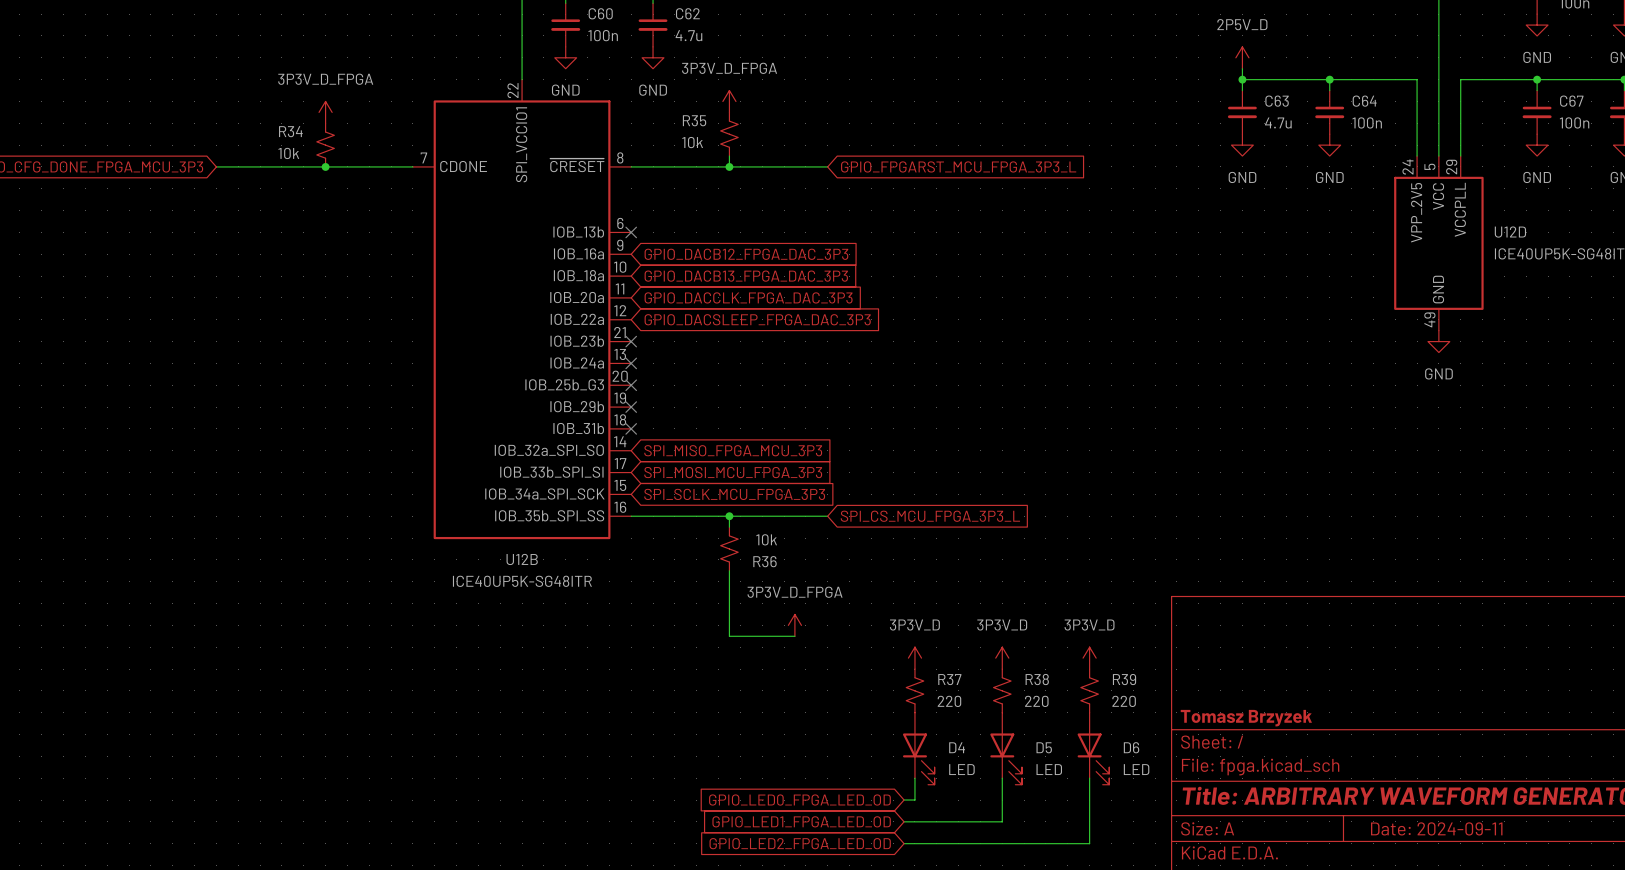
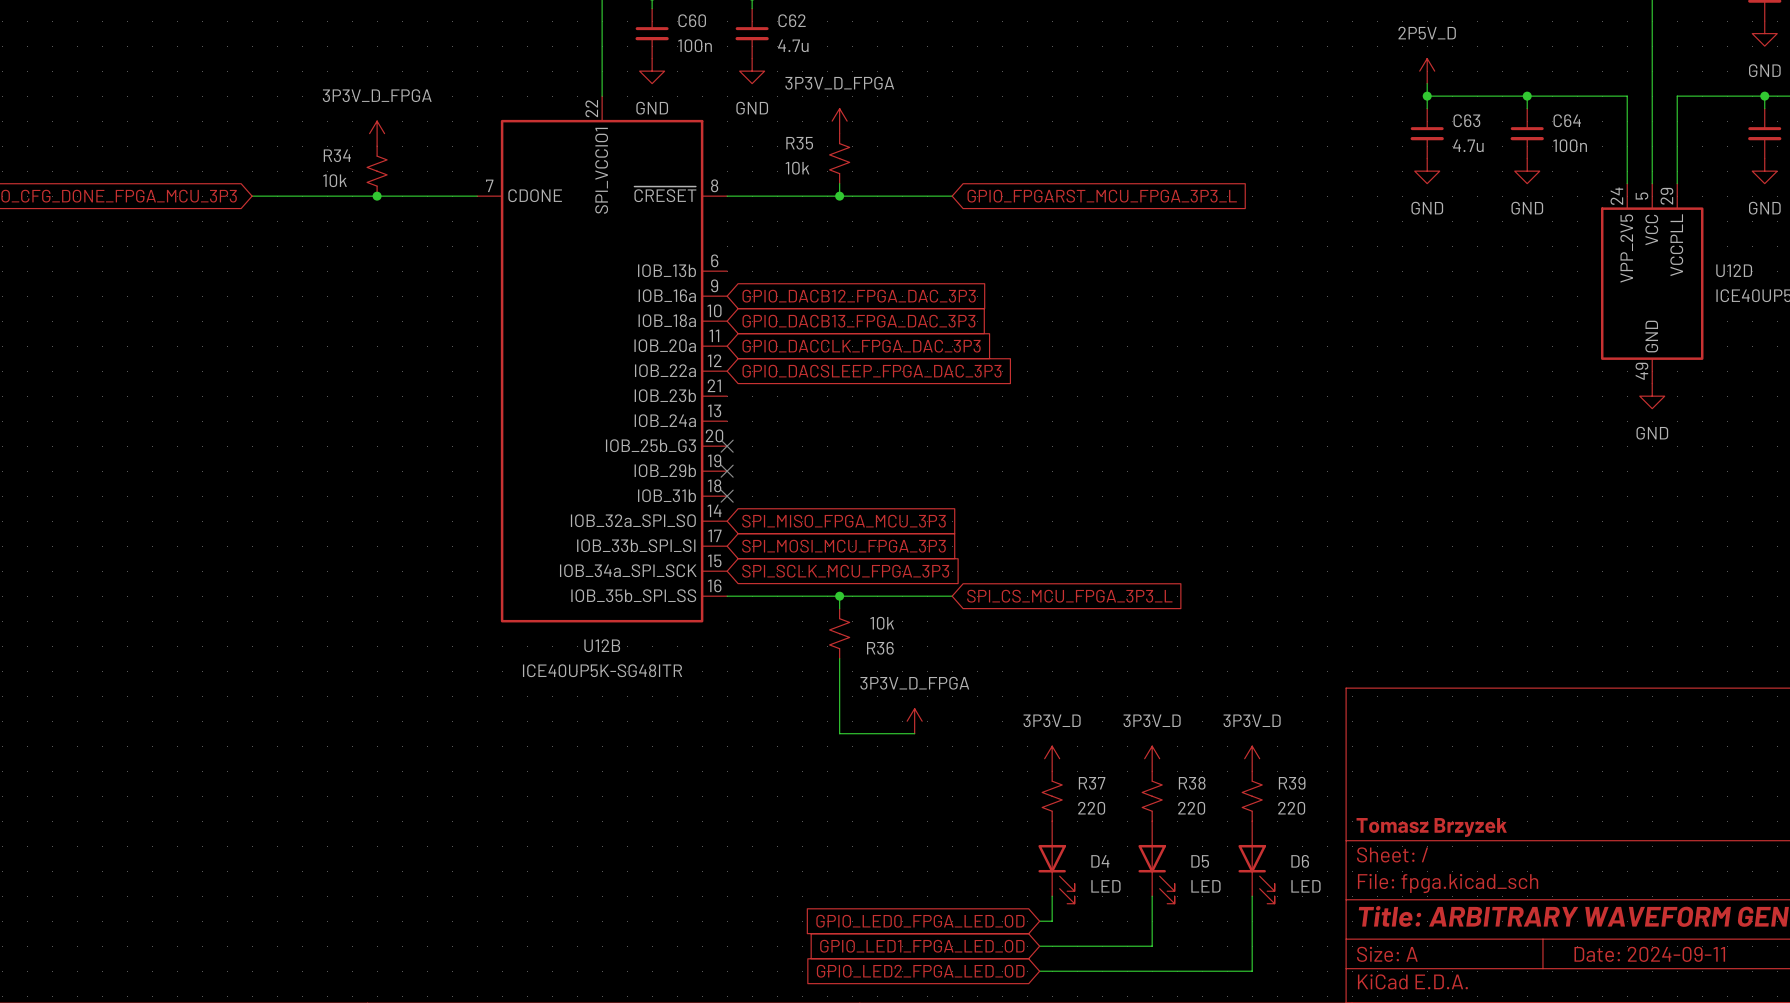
no-connect mark: (631, 232) -> none
no-connect mark: (631, 341) -> none
no-connect mark: (631, 363) -> none

